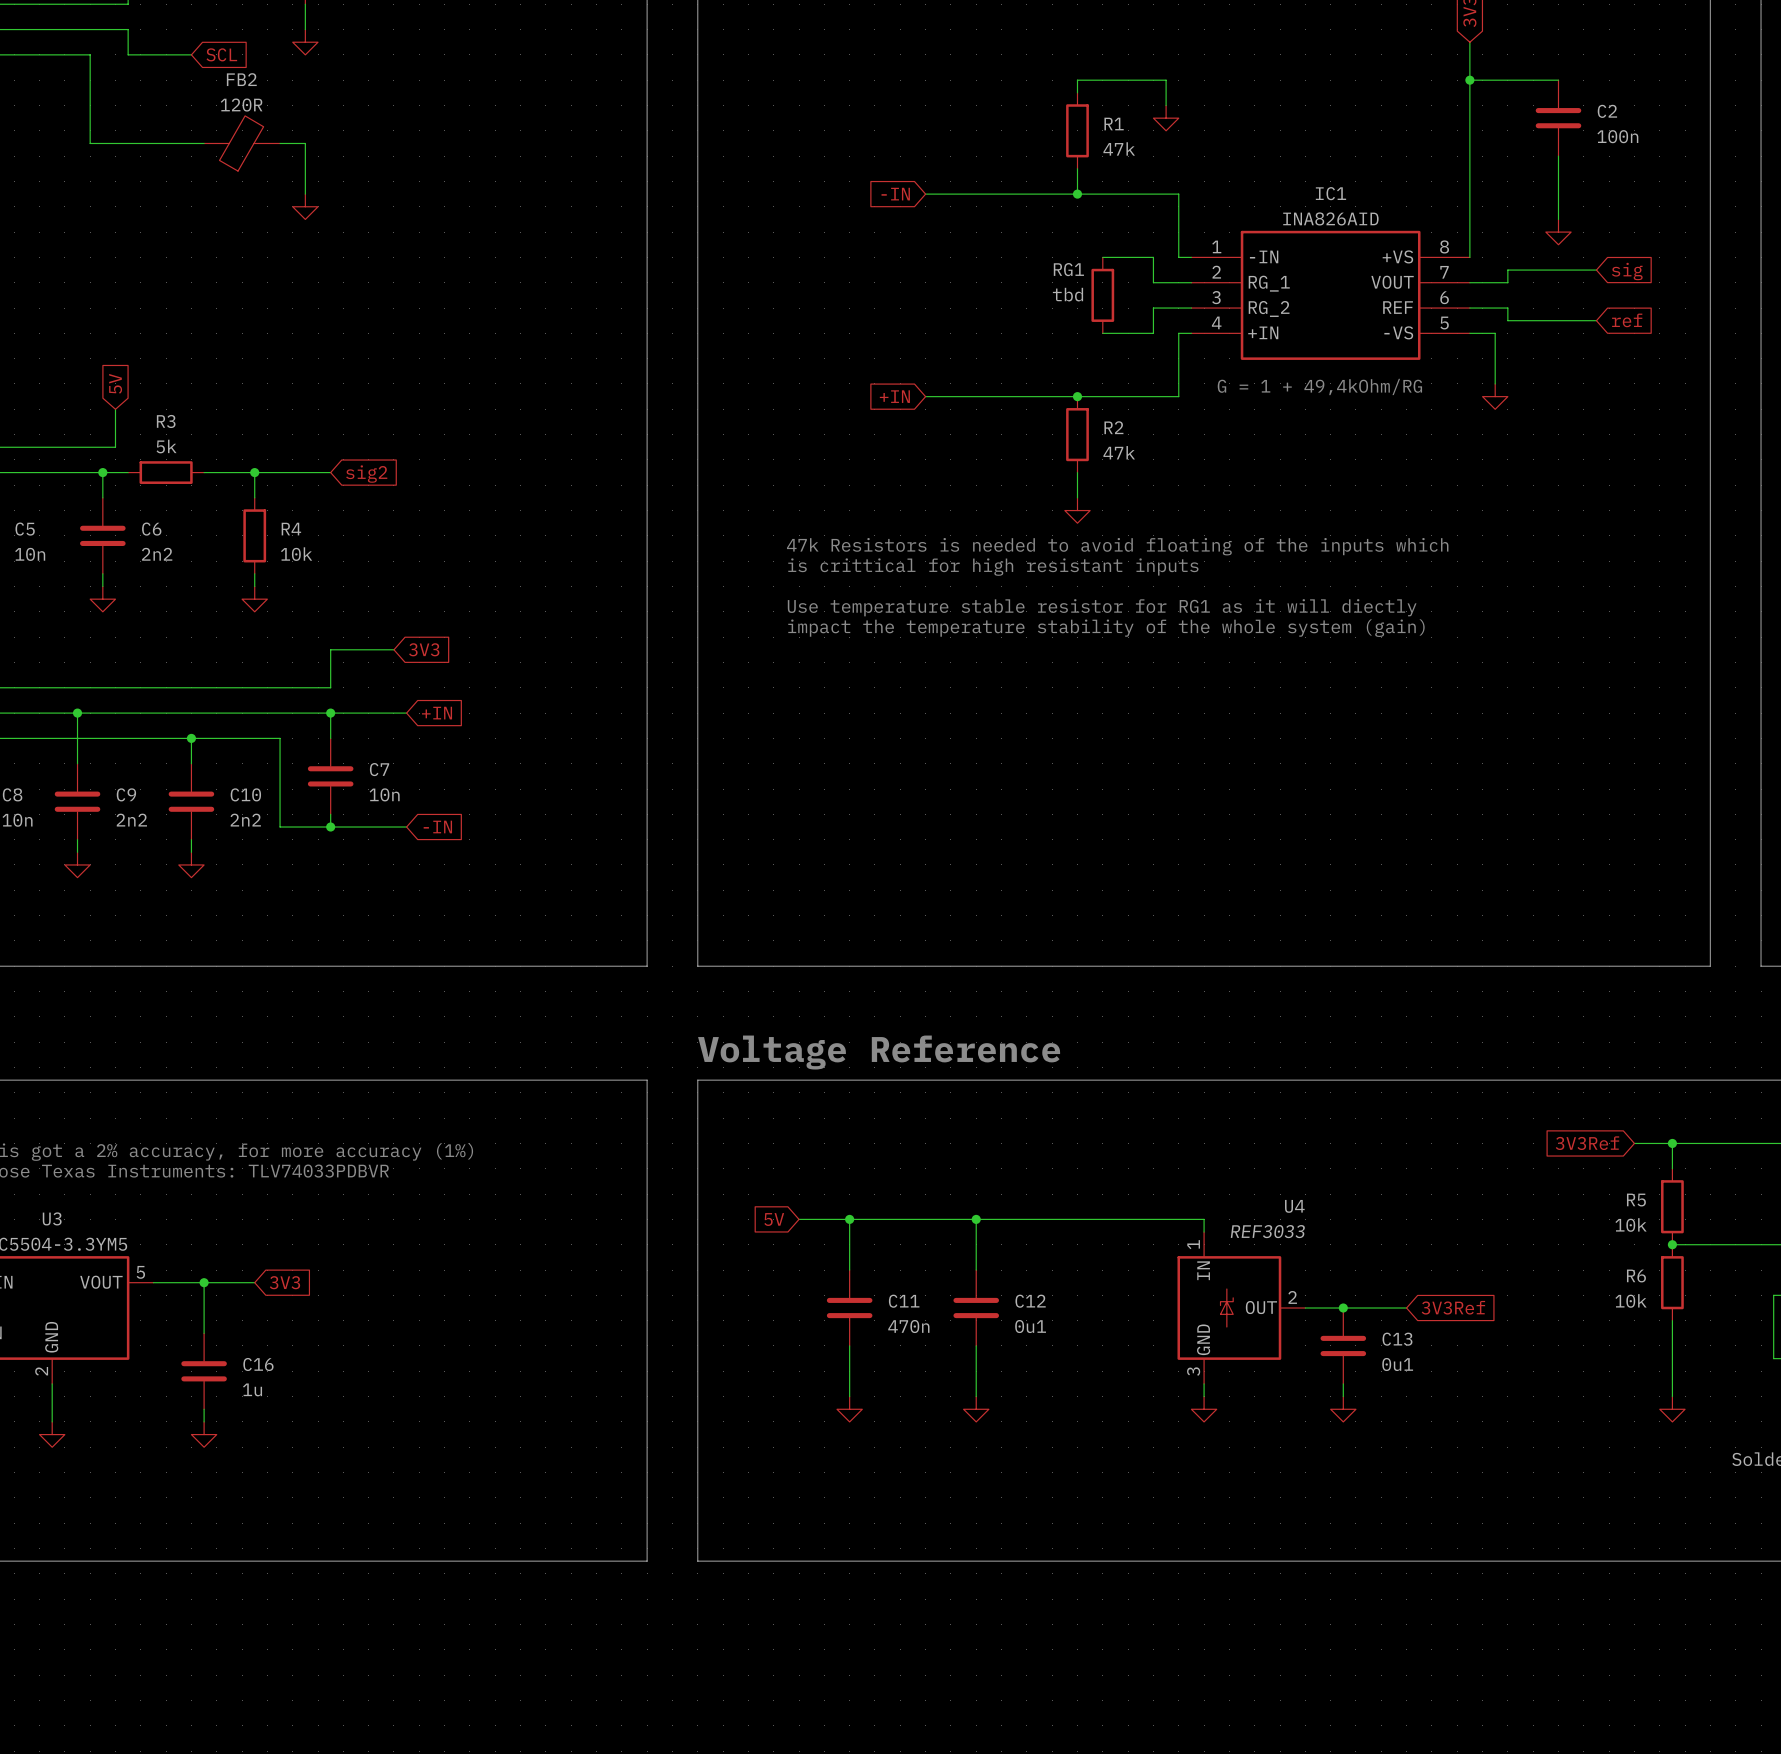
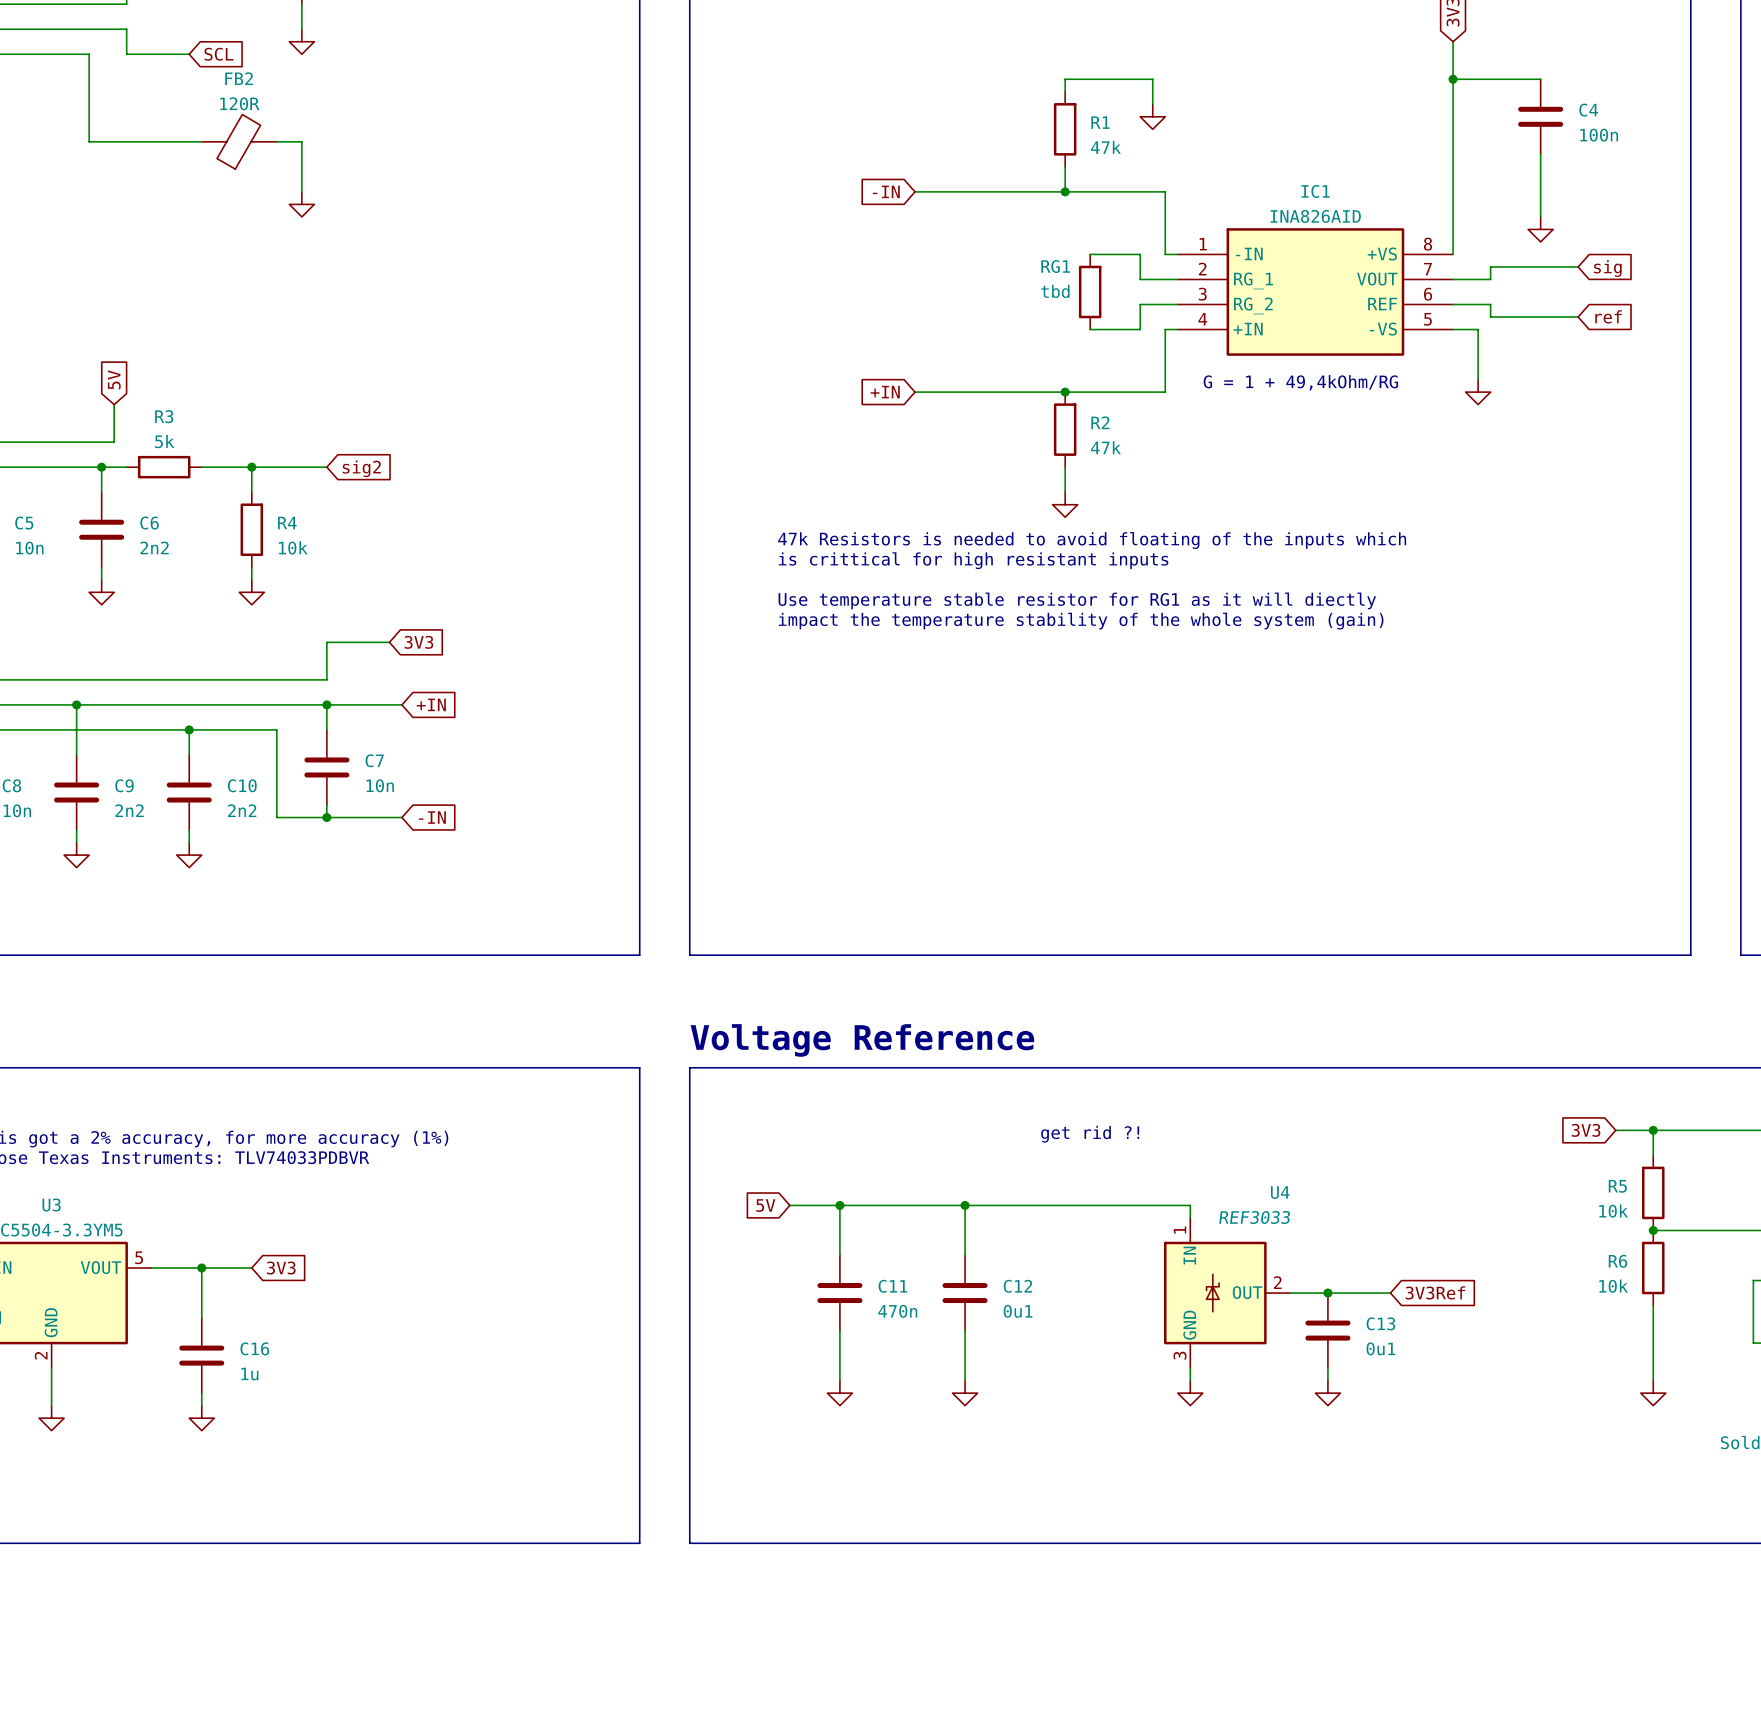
C2 name: C2 (1607, 111) -> C4 (1588, 110)
global label: 3V3Ref (1587, 1143) -> 3V3 (1586, 1130)
text: none -> get rid ?! (1090, 1134)

